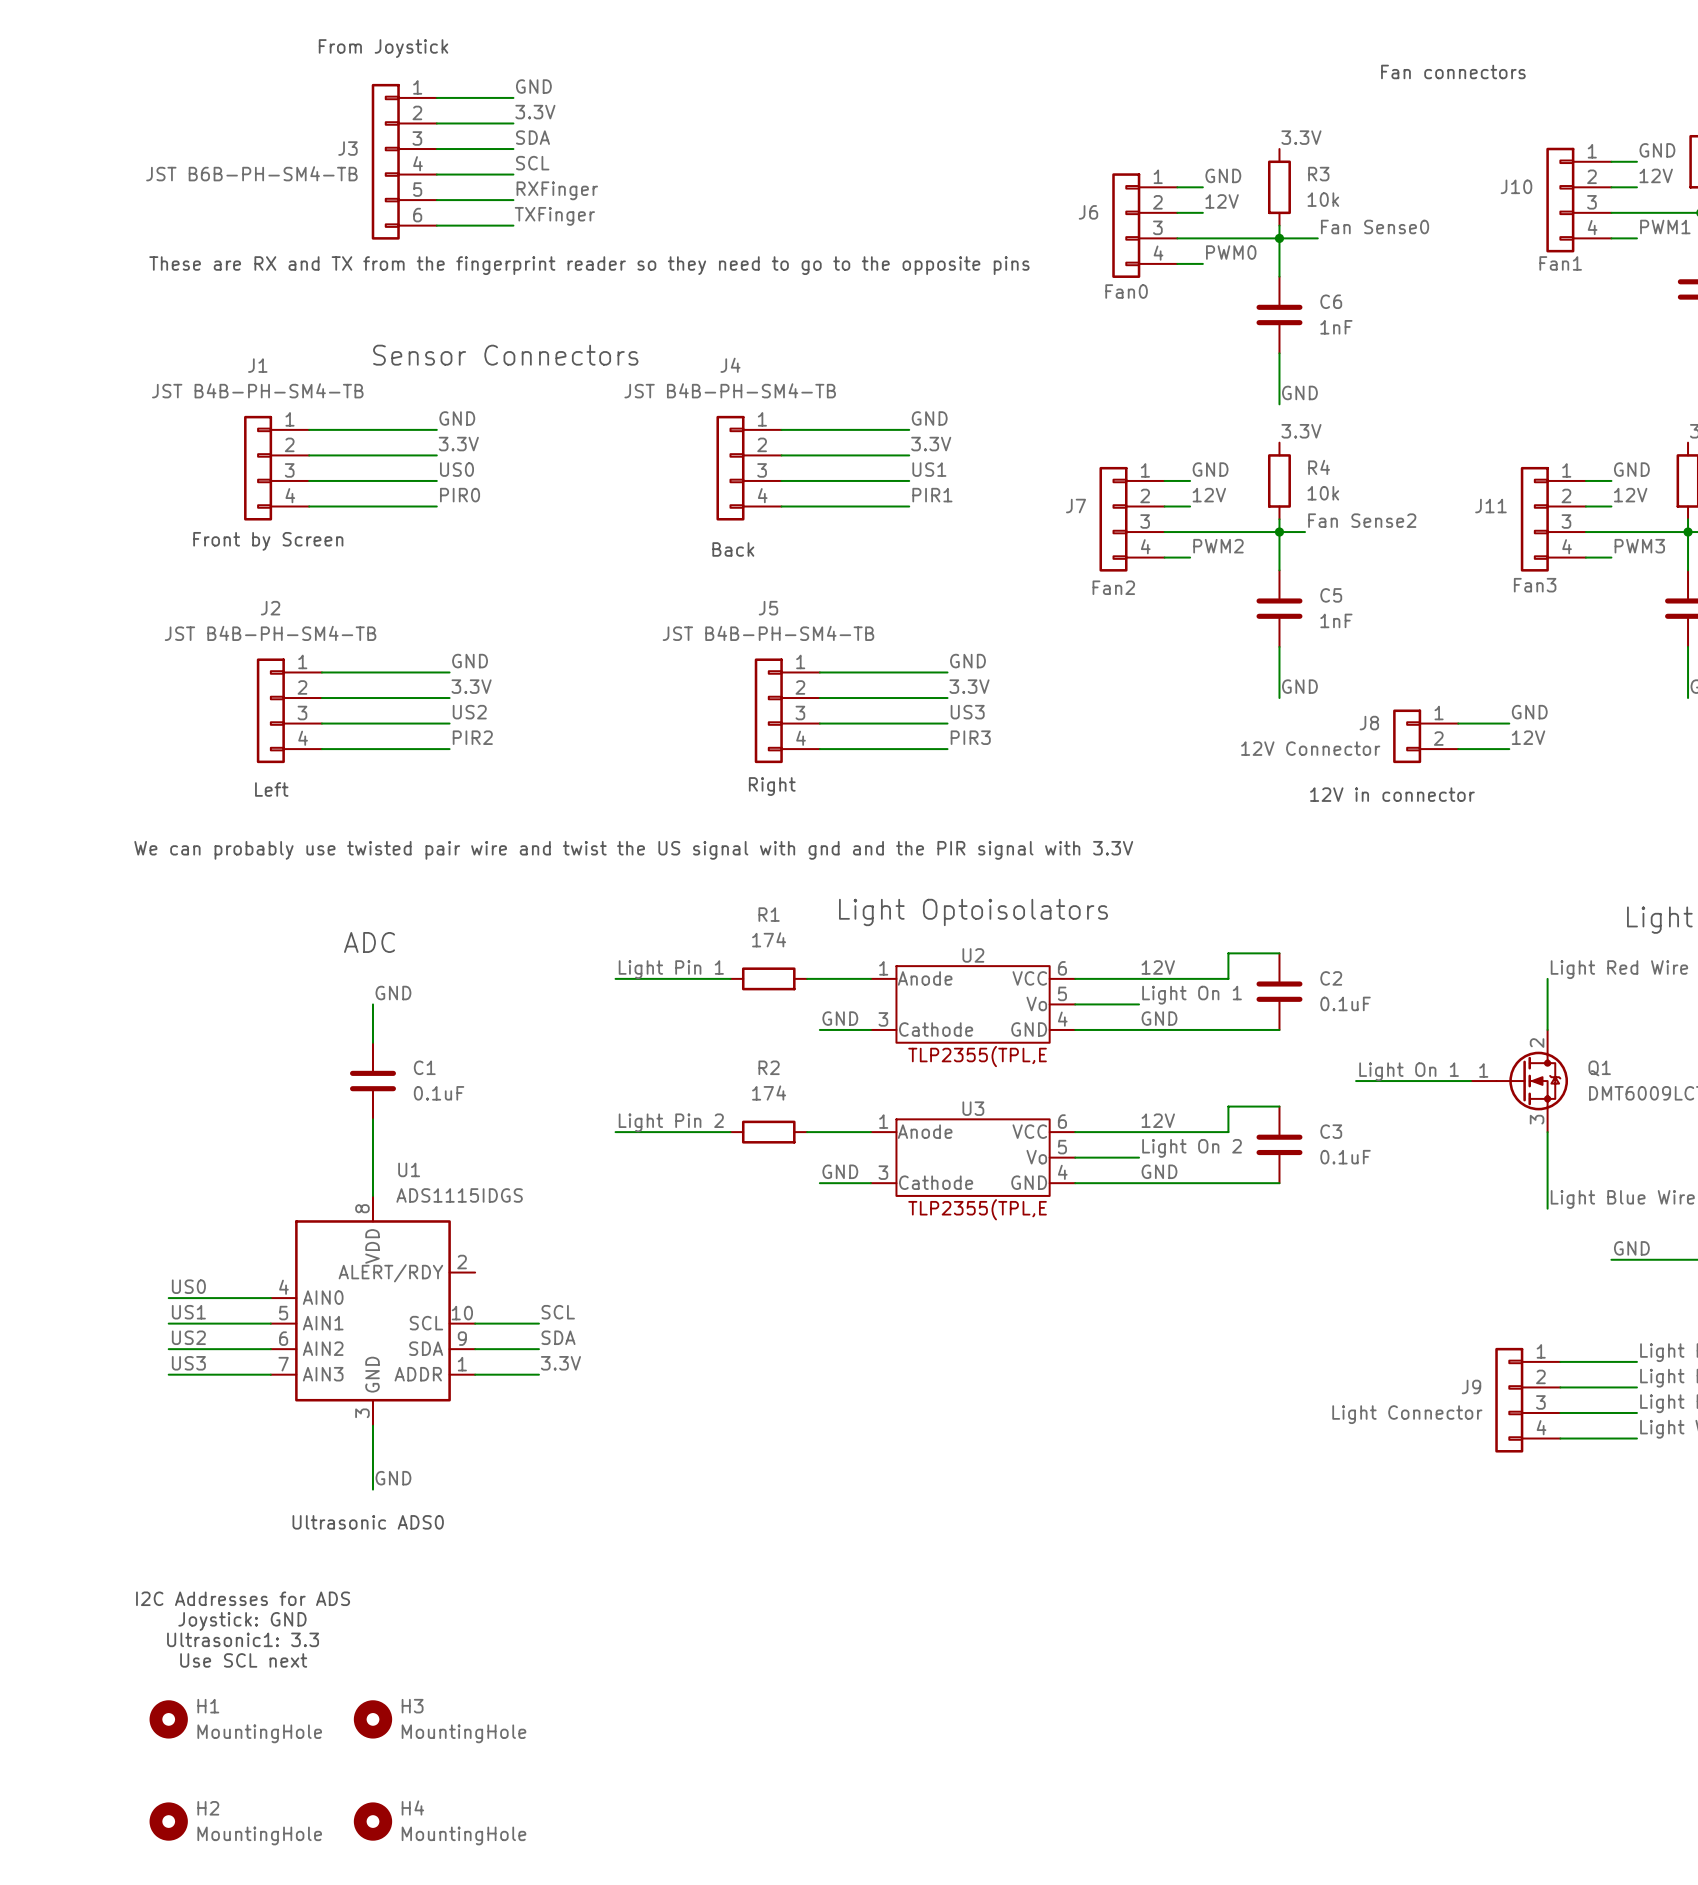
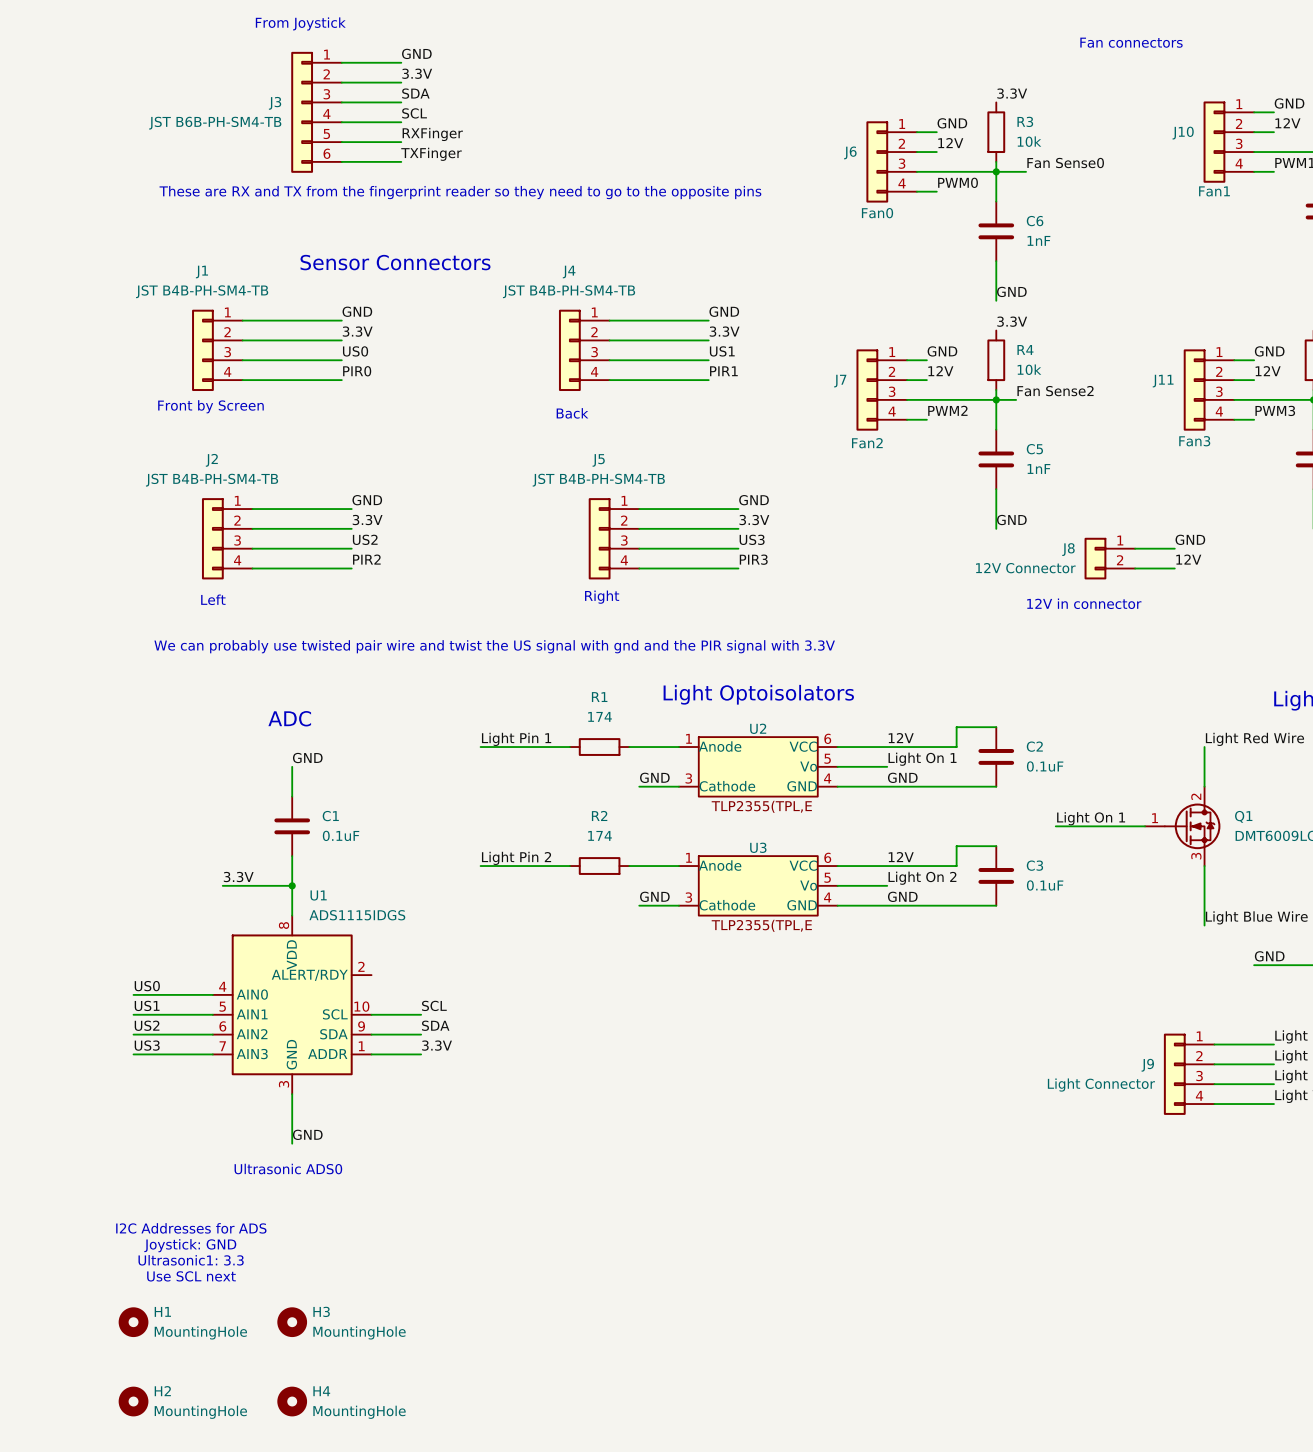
label: none -> 3.3V (238, 877)
wire: none -> (222, 885) (292, 885)
junction: none -> (292, 885)

